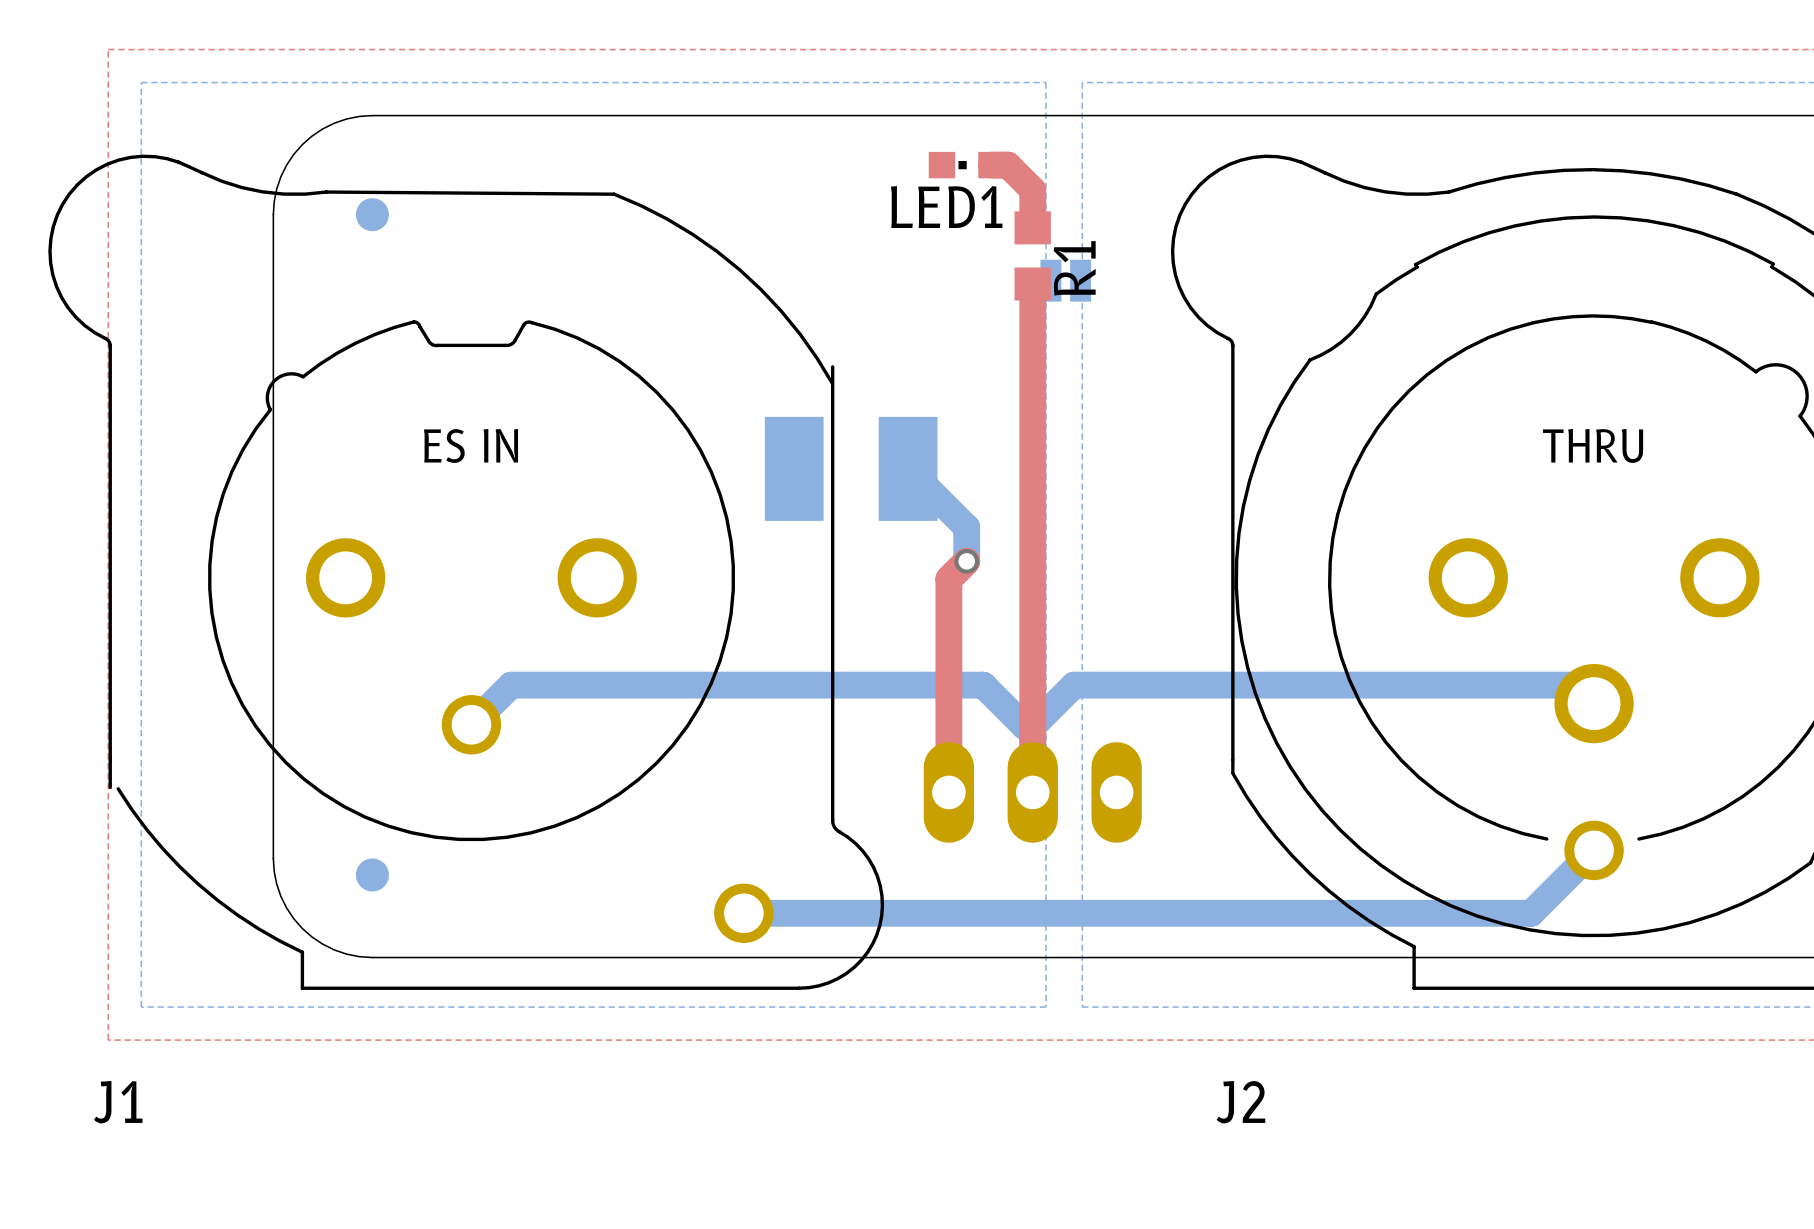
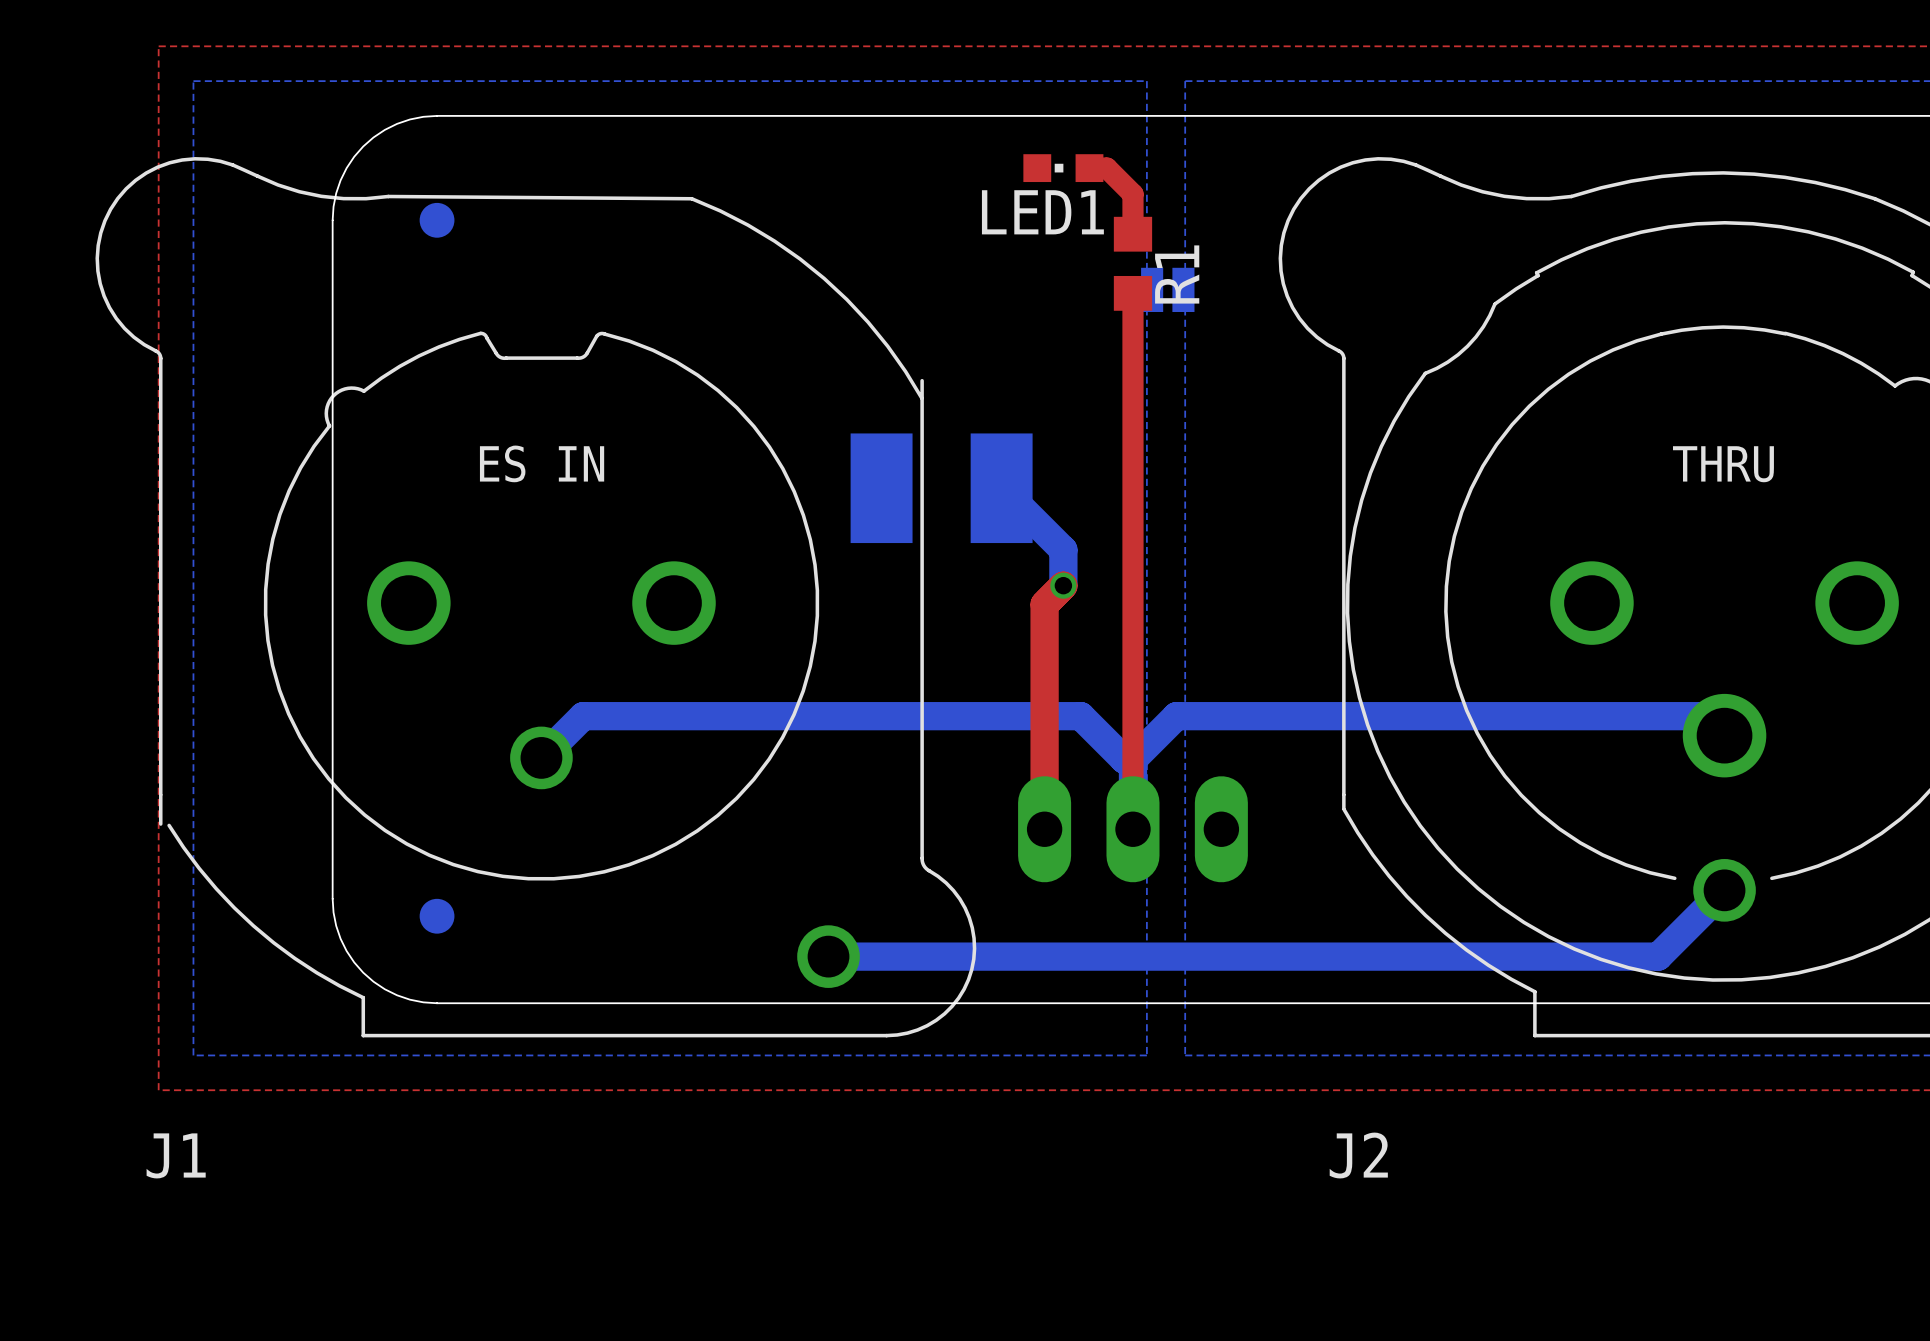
top track width: thick (991, 165) (1008, 165) (1032, 189) (1032, 227) -> thin (1089, 168) (1106, 168) (1132, 194) (1132, 234)
top track width: thick (1032, 283) (1032, 792) -> thin (1132, 293) (1132, 829)

